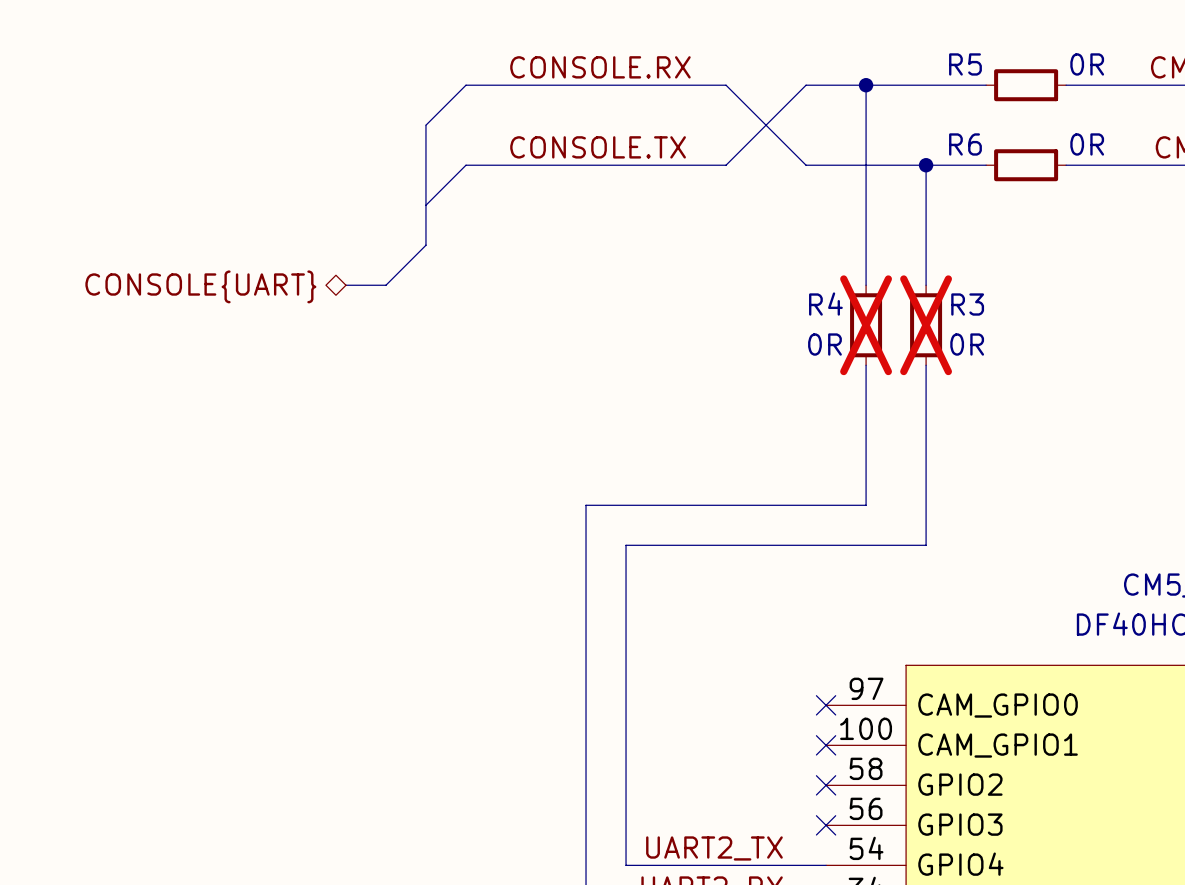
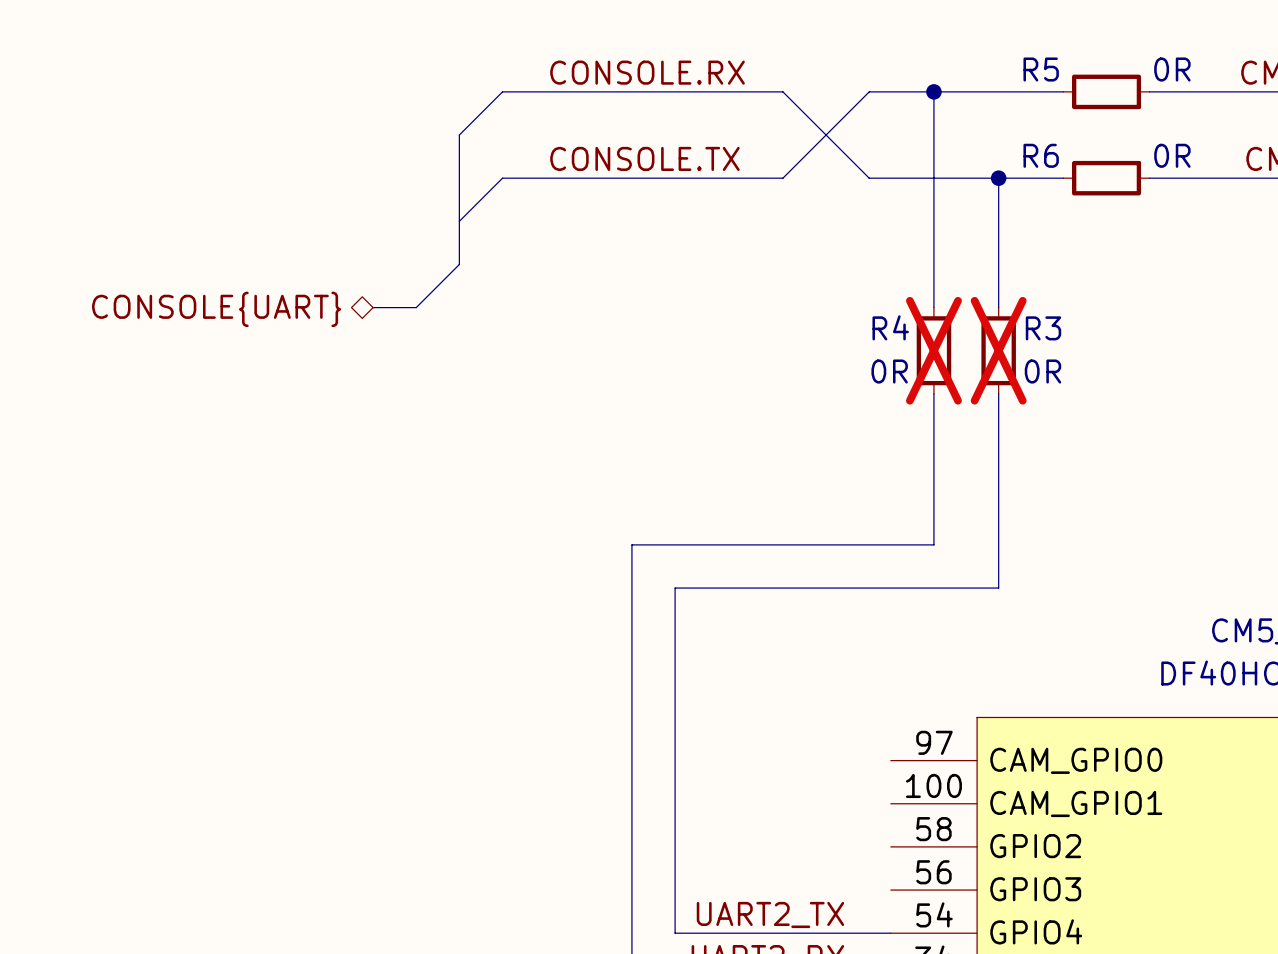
no-connect mark: (826, 705) -> none
no-connect mark: (826, 745) -> none
no-connect mark: (826, 785) -> none
no-connect mark: (826, 825) -> none

